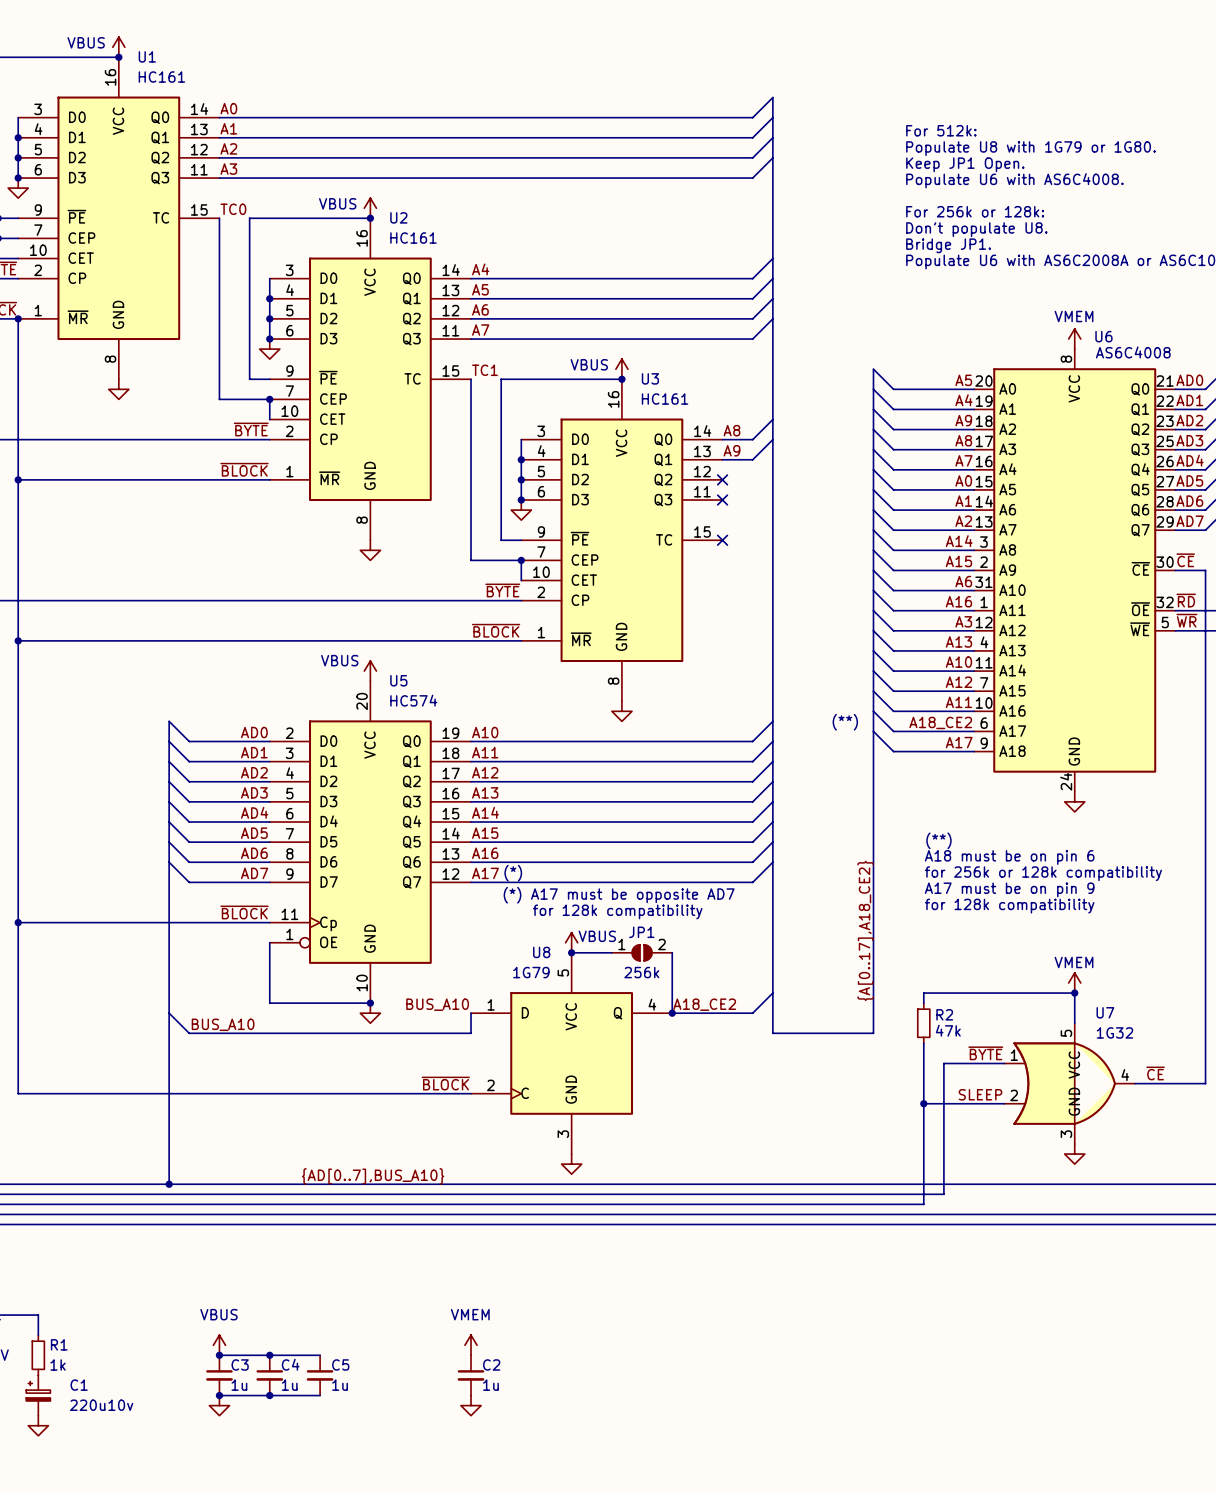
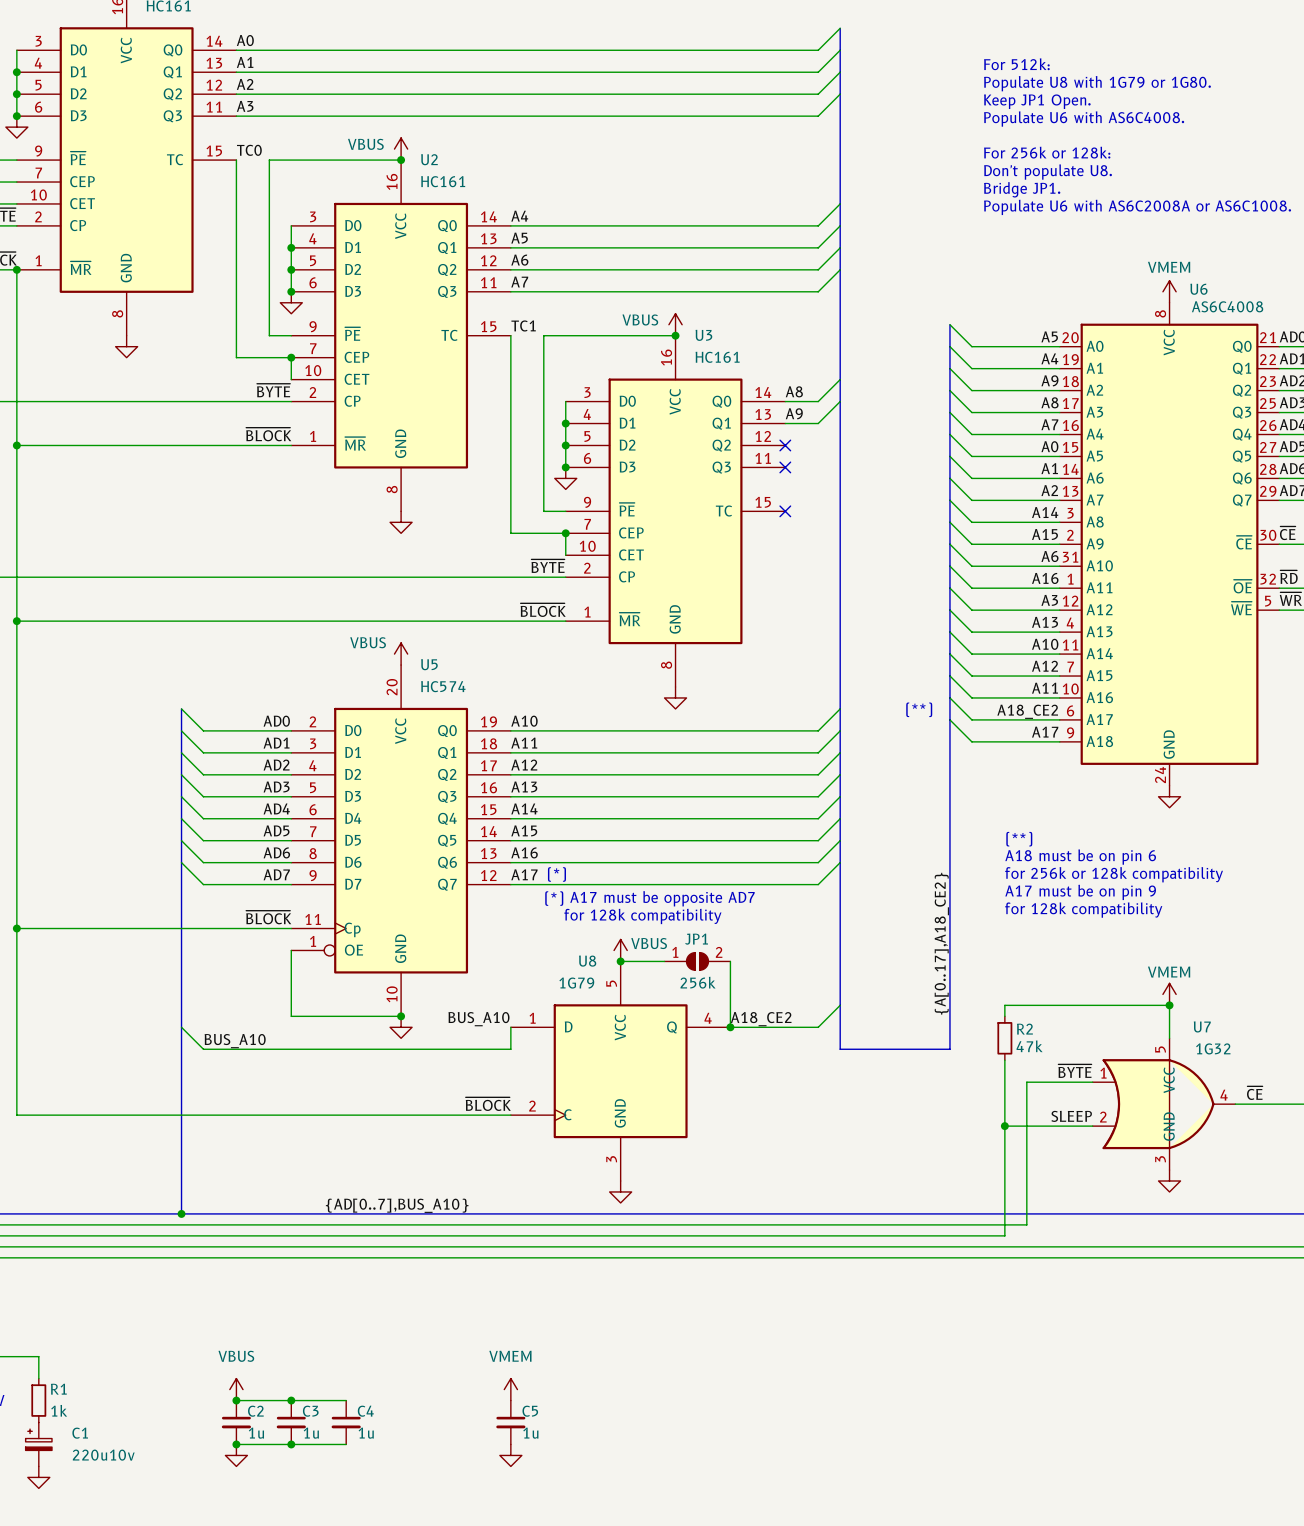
C3 name: C3 (240, 1364) -> C2 (255, 1411)
C4 name: C4 (290, 1364) -> C3 (310, 1411)
C5 name: C5 (340, 1364) -> C4 (365, 1411)
C2 name: C2 (491, 1364) -> C5 (530, 1411)

